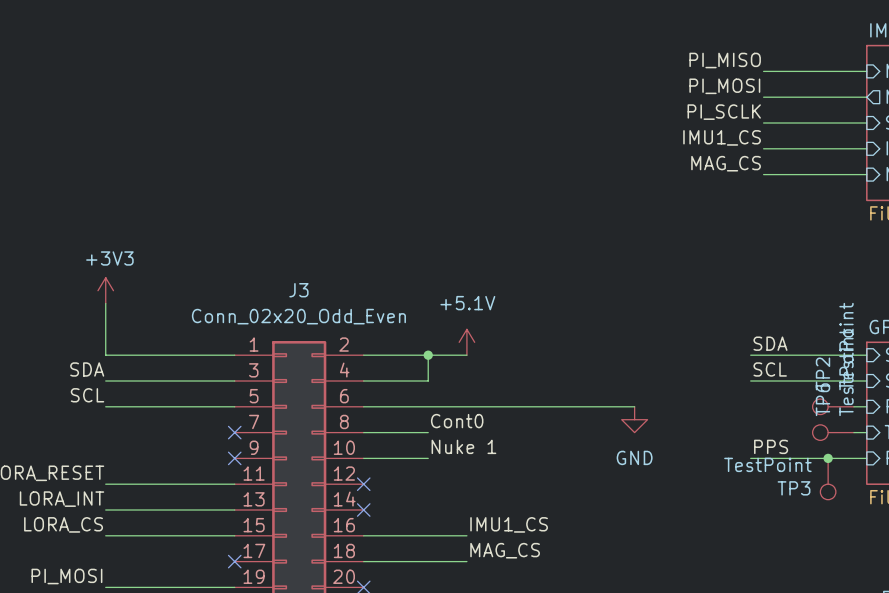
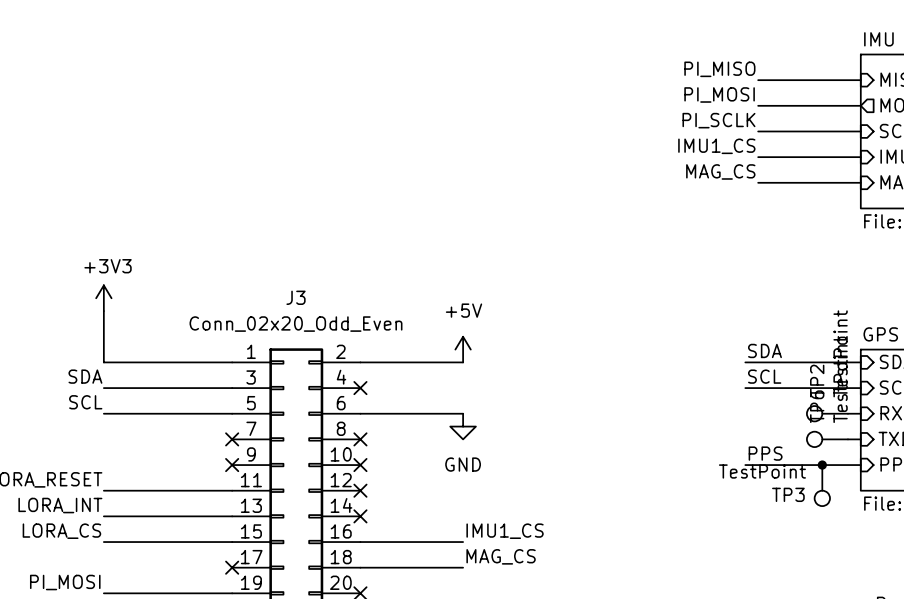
power symbol: +5.1V (466, 342) -> +5V (463, 349)
wire: (428, 355) (428, 381) (363, 381) -> none
junction: (428, 355) -> none
no-connect mark: none -> (360, 388)
wire: (466, 406) (634, 406) -> none
power symbol position: GND (634, 419) -> GND (463, 426)
label: Cont0 (457, 421) -> none
wire: (363, 432) (428, 432) -> none
no-connect mark: none -> (360, 439)
label: Nuke 1 (463, 446) -> none
wire: (363, 458) (428, 458) -> none
no-connect mark: none -> (360, 465)

